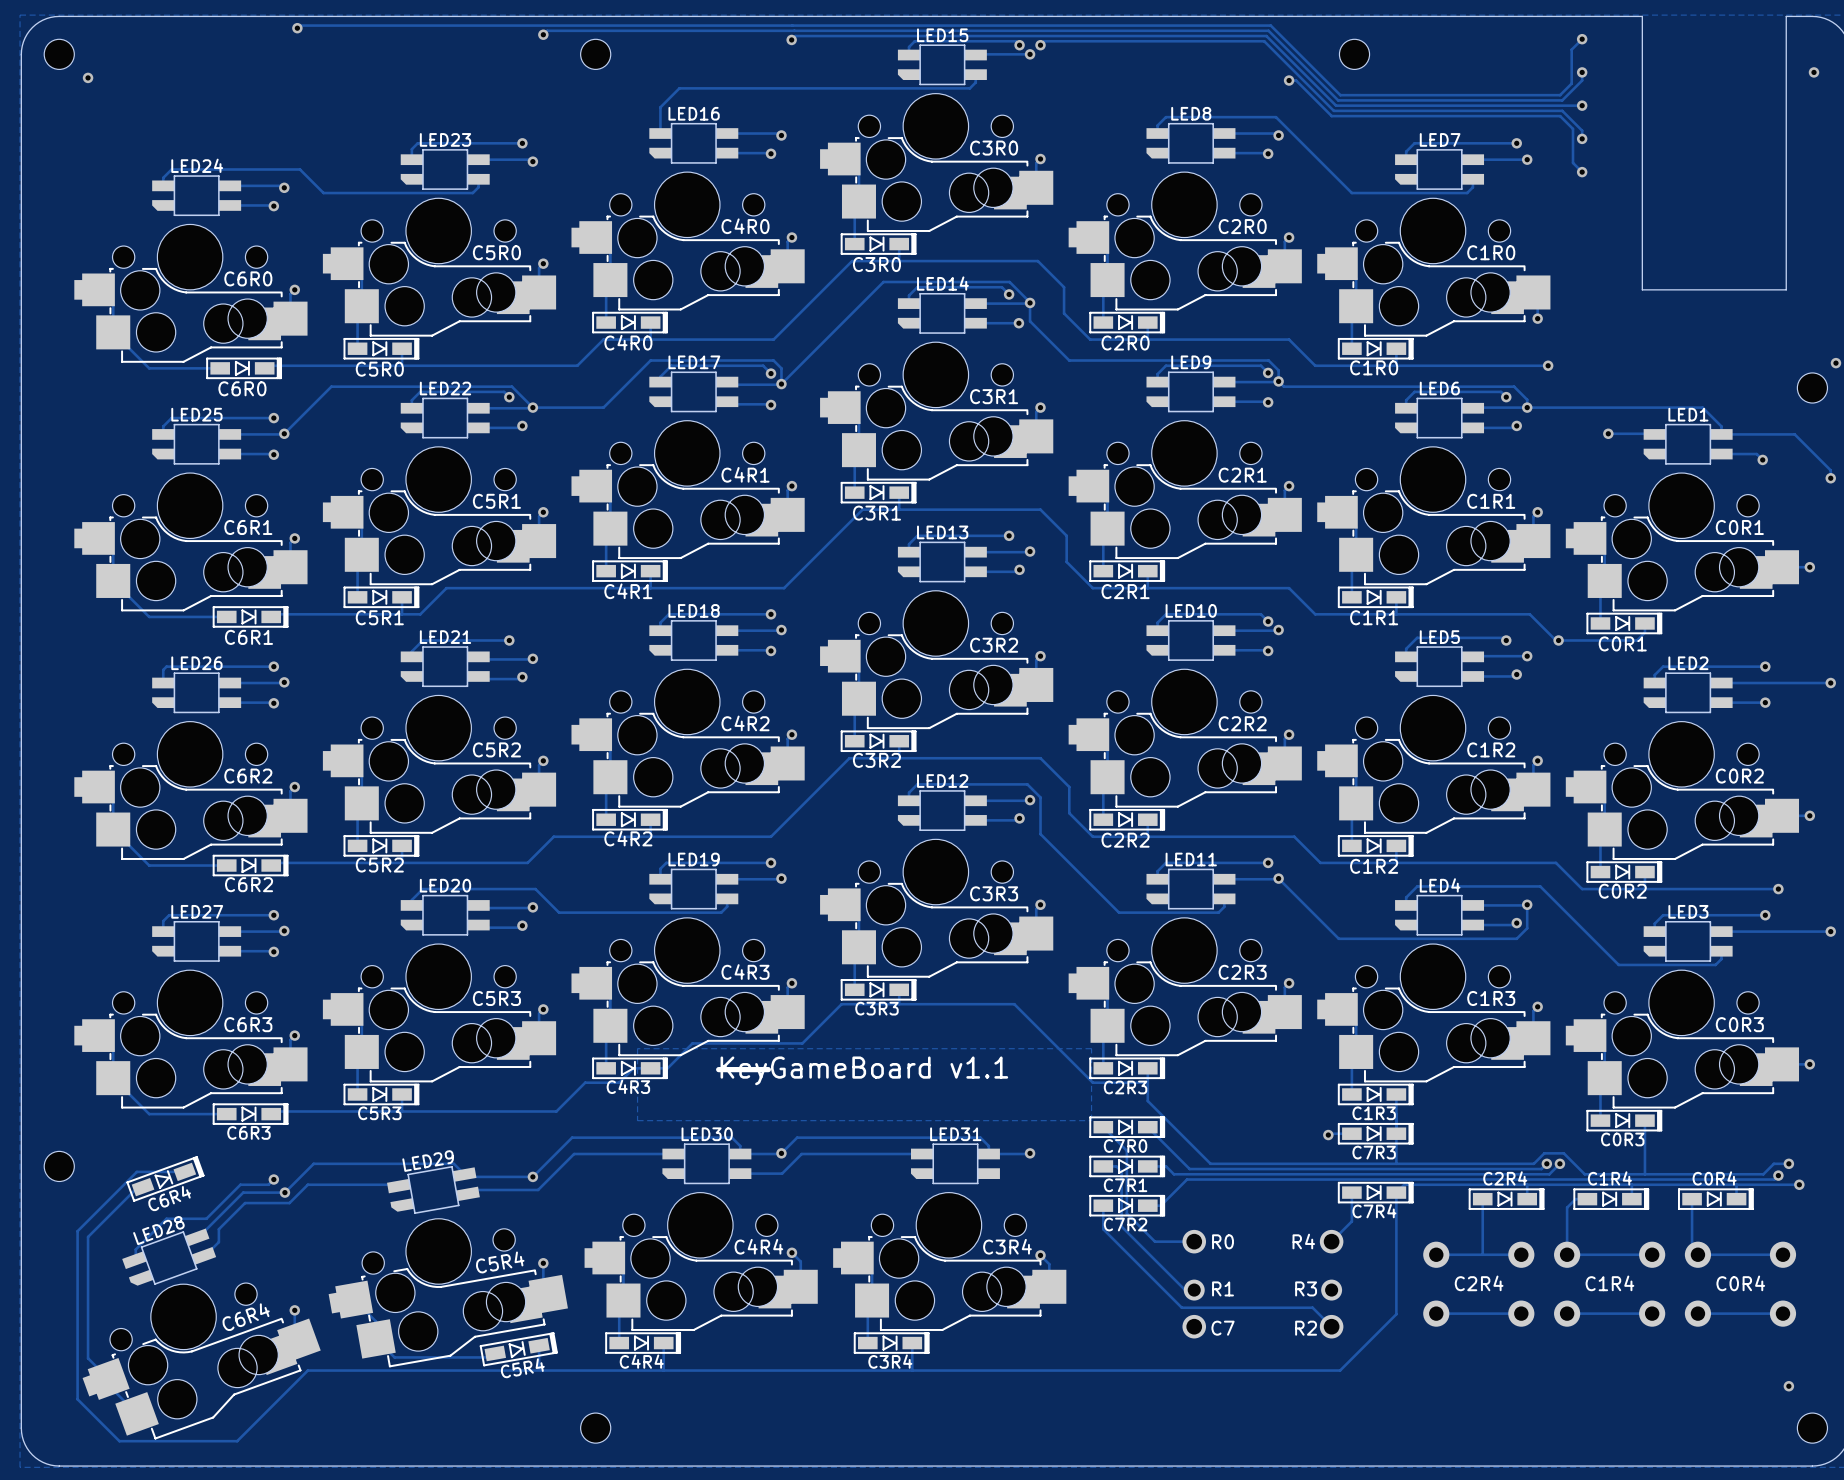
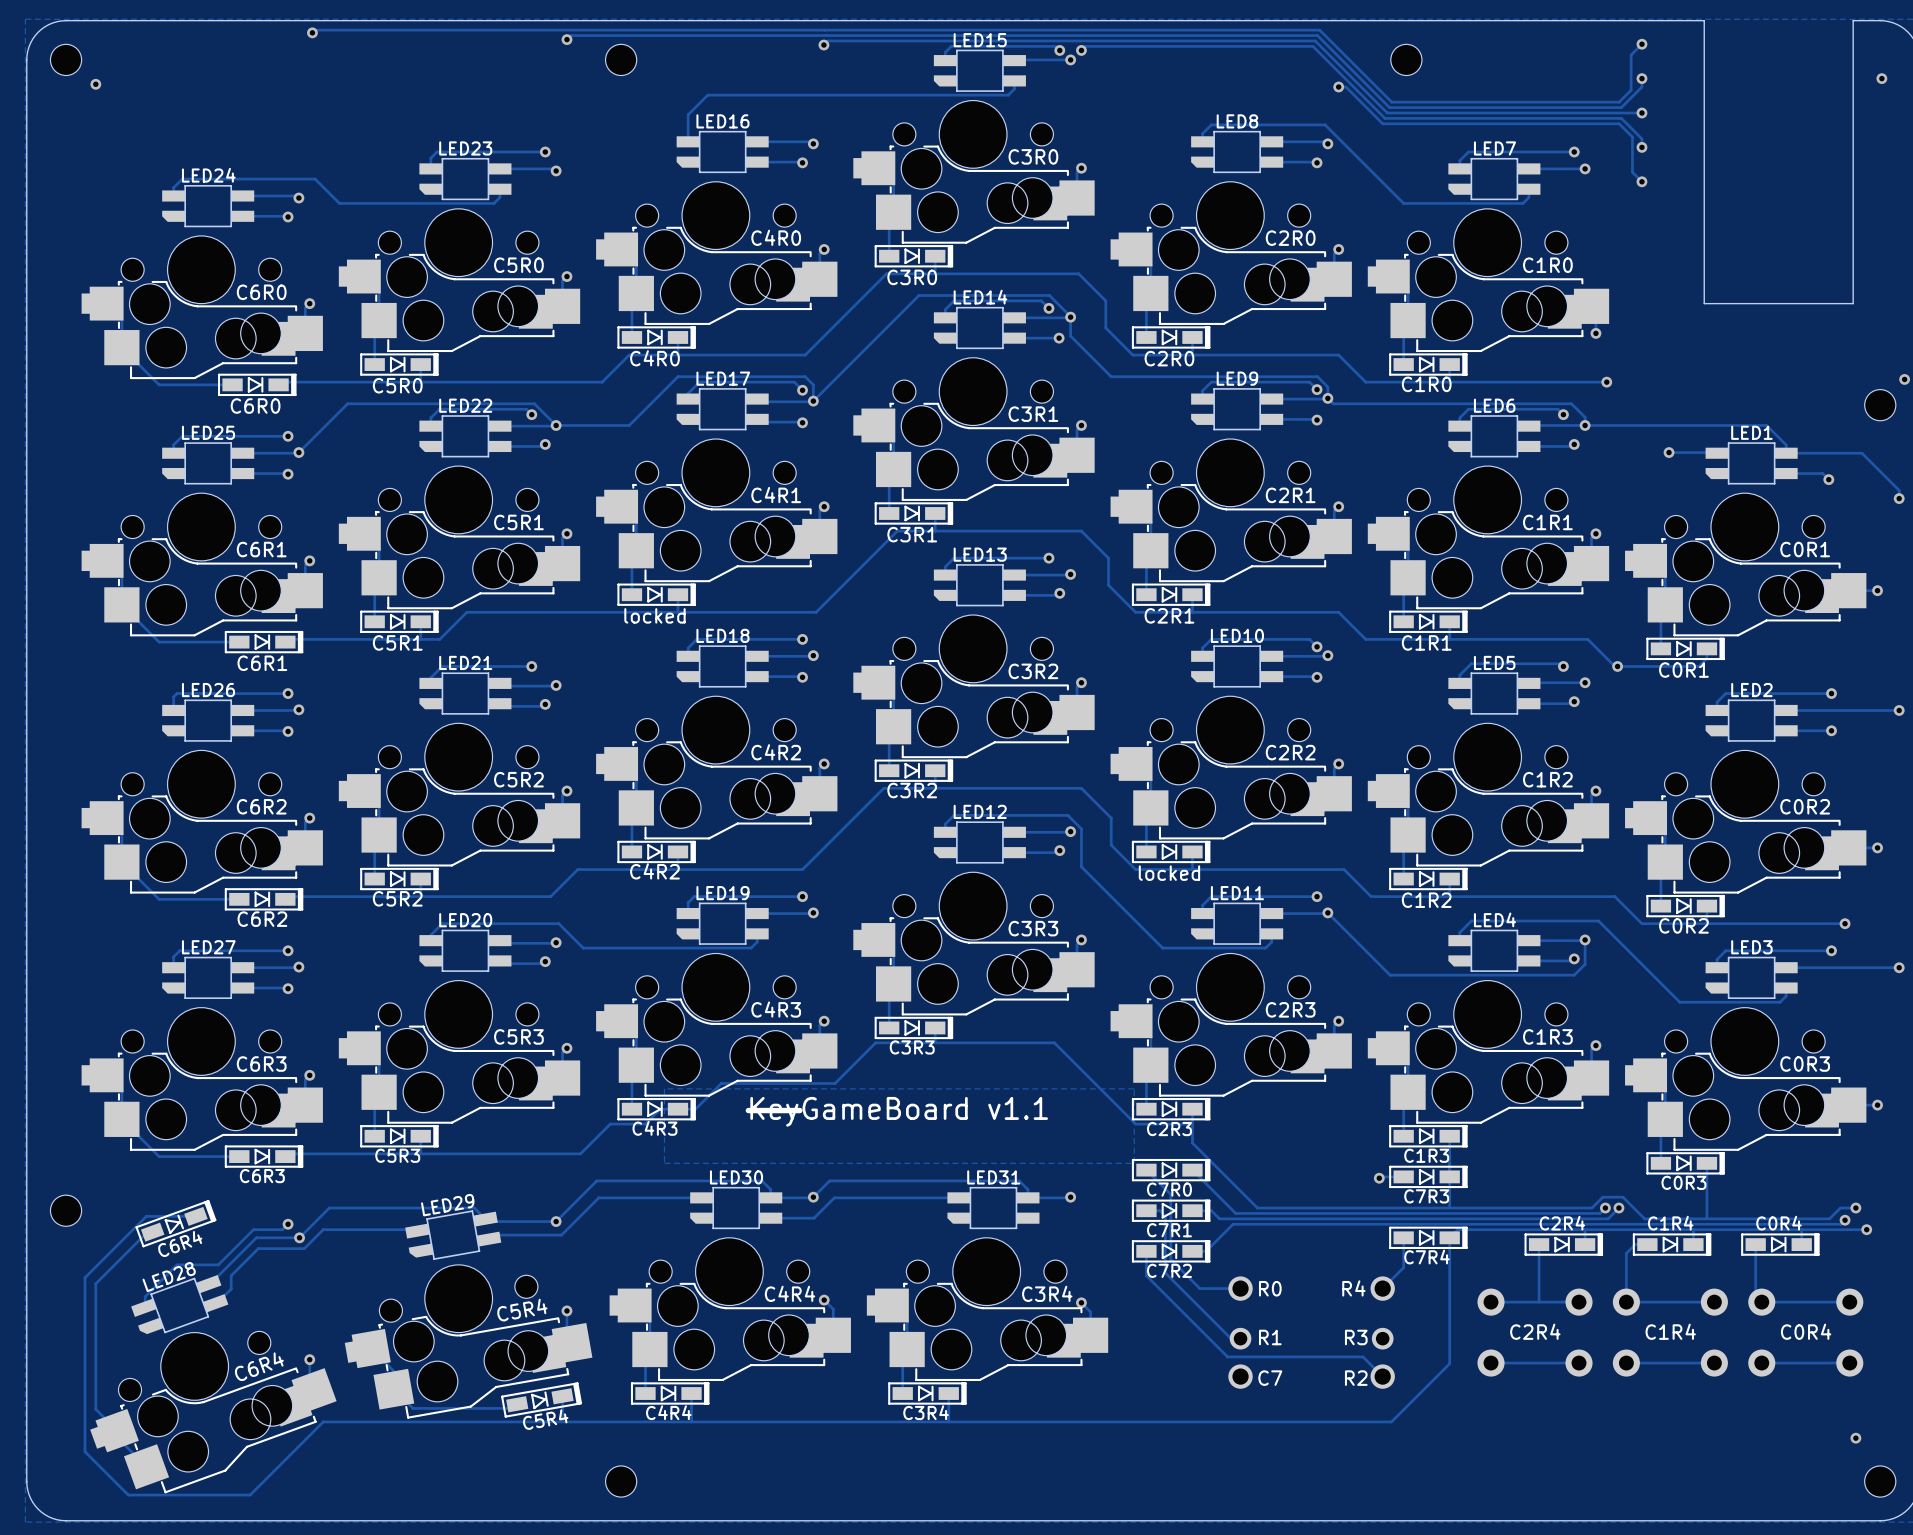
part text: C4R1 (628, 591) -> locked (654, 615)
part text: C2R2 (1125, 840) -> locked (1169, 873)

